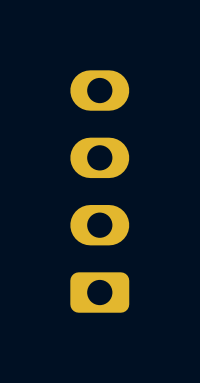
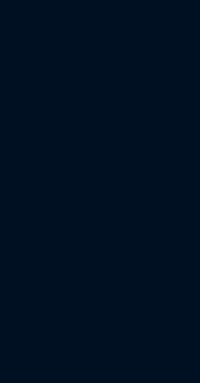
part: (99, 191) -> none

